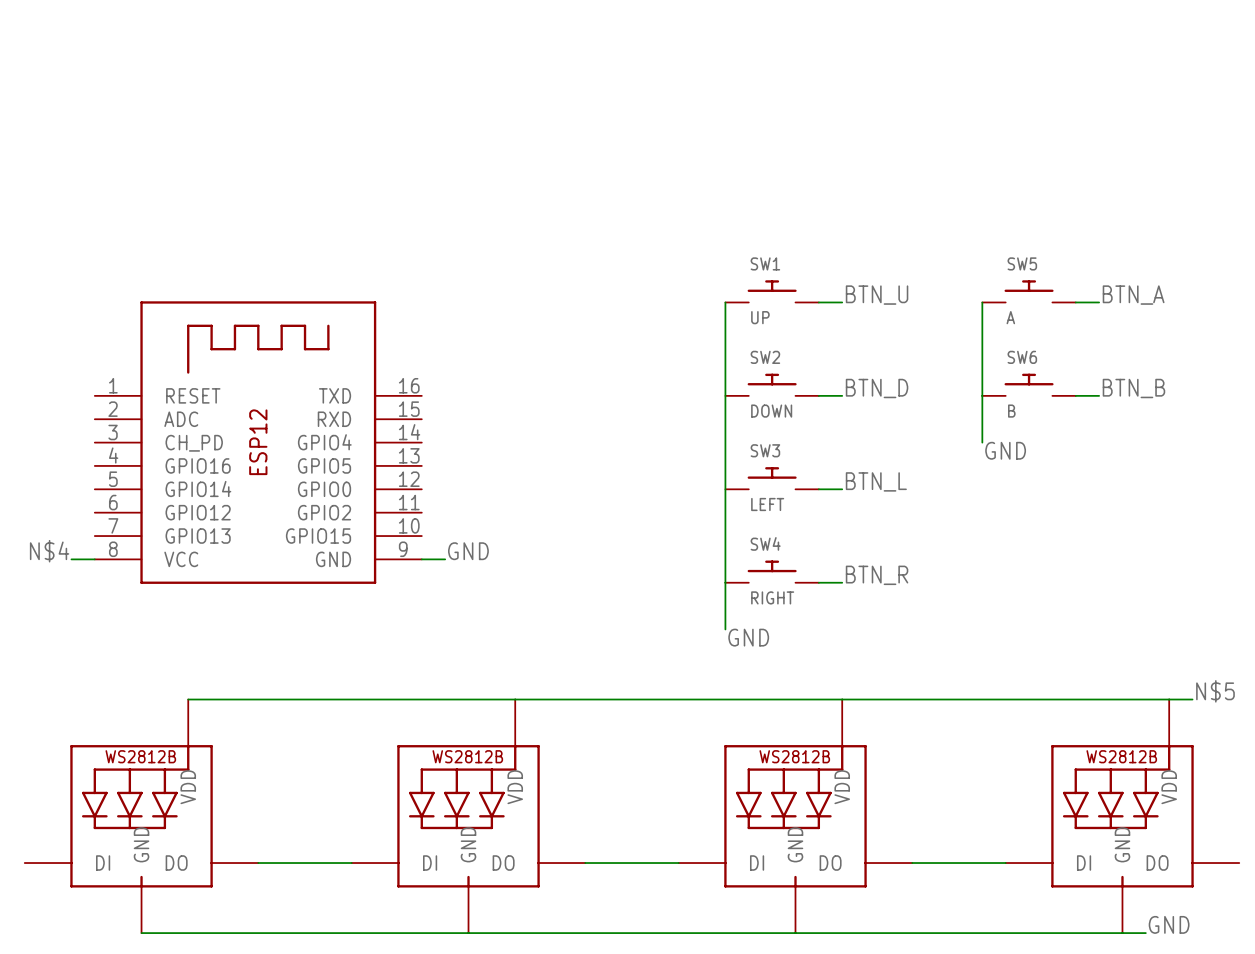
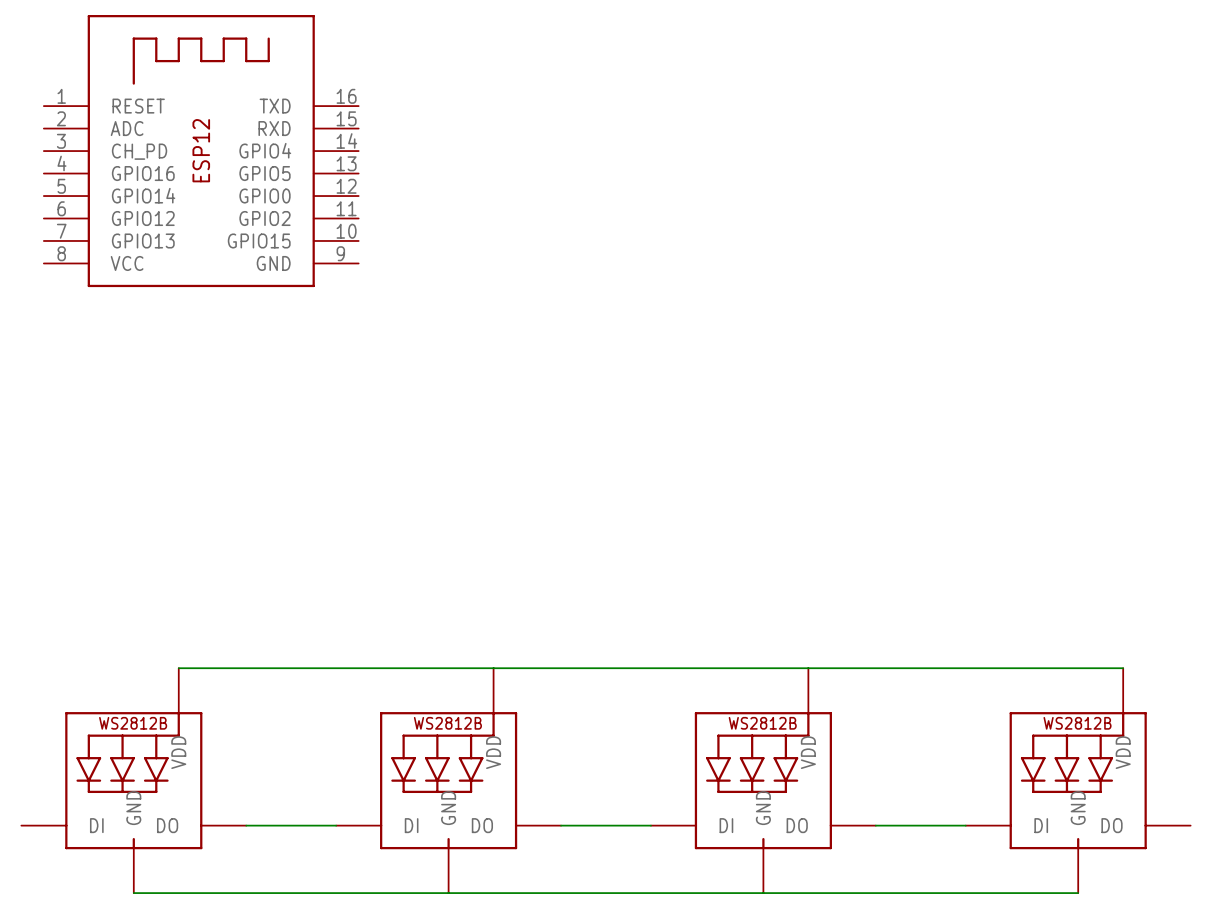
part: none -> (201, 151)
SW1: UP (772, 291) -> none
SW5: A (1029, 291) -> none
label: BTN_U (877, 295) -> none
label: BTN_A (1133, 295) -> none
wire: (725, 302) (725, 629) -> none
wire: (818, 302) (842, 302) -> none
wire: (982, 302) (982, 442) -> none
wire: (1075, 302) (1099, 302) -> none
SW2: DOWN (772, 384) -> none
SW6: B (1029, 384) -> none
label: BTN_D (877, 388) -> none
label: BTN_B (1133, 388) -> none
wire: (818, 395) (842, 395) -> none
wire: (1075, 395) (1099, 395) -> none
part: (258, 442) -> none
label: GND (1005, 450) -> none
SW3: LEFT (772, 478) -> none
label: BTN_L (876, 481) -> none
wire: (818, 489) (842, 489) -> none
label: N$4 (49, 551) -> none
label: GND (468, 551) -> none
wire: (71, 559) (94, 559) -> none
wire: (421, 559) (445, 559) -> none
SW4: RIGHT (772, 571) -> none
label: BTN_R (877, 575) -> none
wire: (818, 582) (842, 582) -> none
label: GND (748, 637) -> none
label: N$5 (1215, 691) -> none
wire: (1169, 699) (1192, 699) -> none
label: GND (1169, 924) -> none
wire: (1122, 933) (1145, 933) -> none

